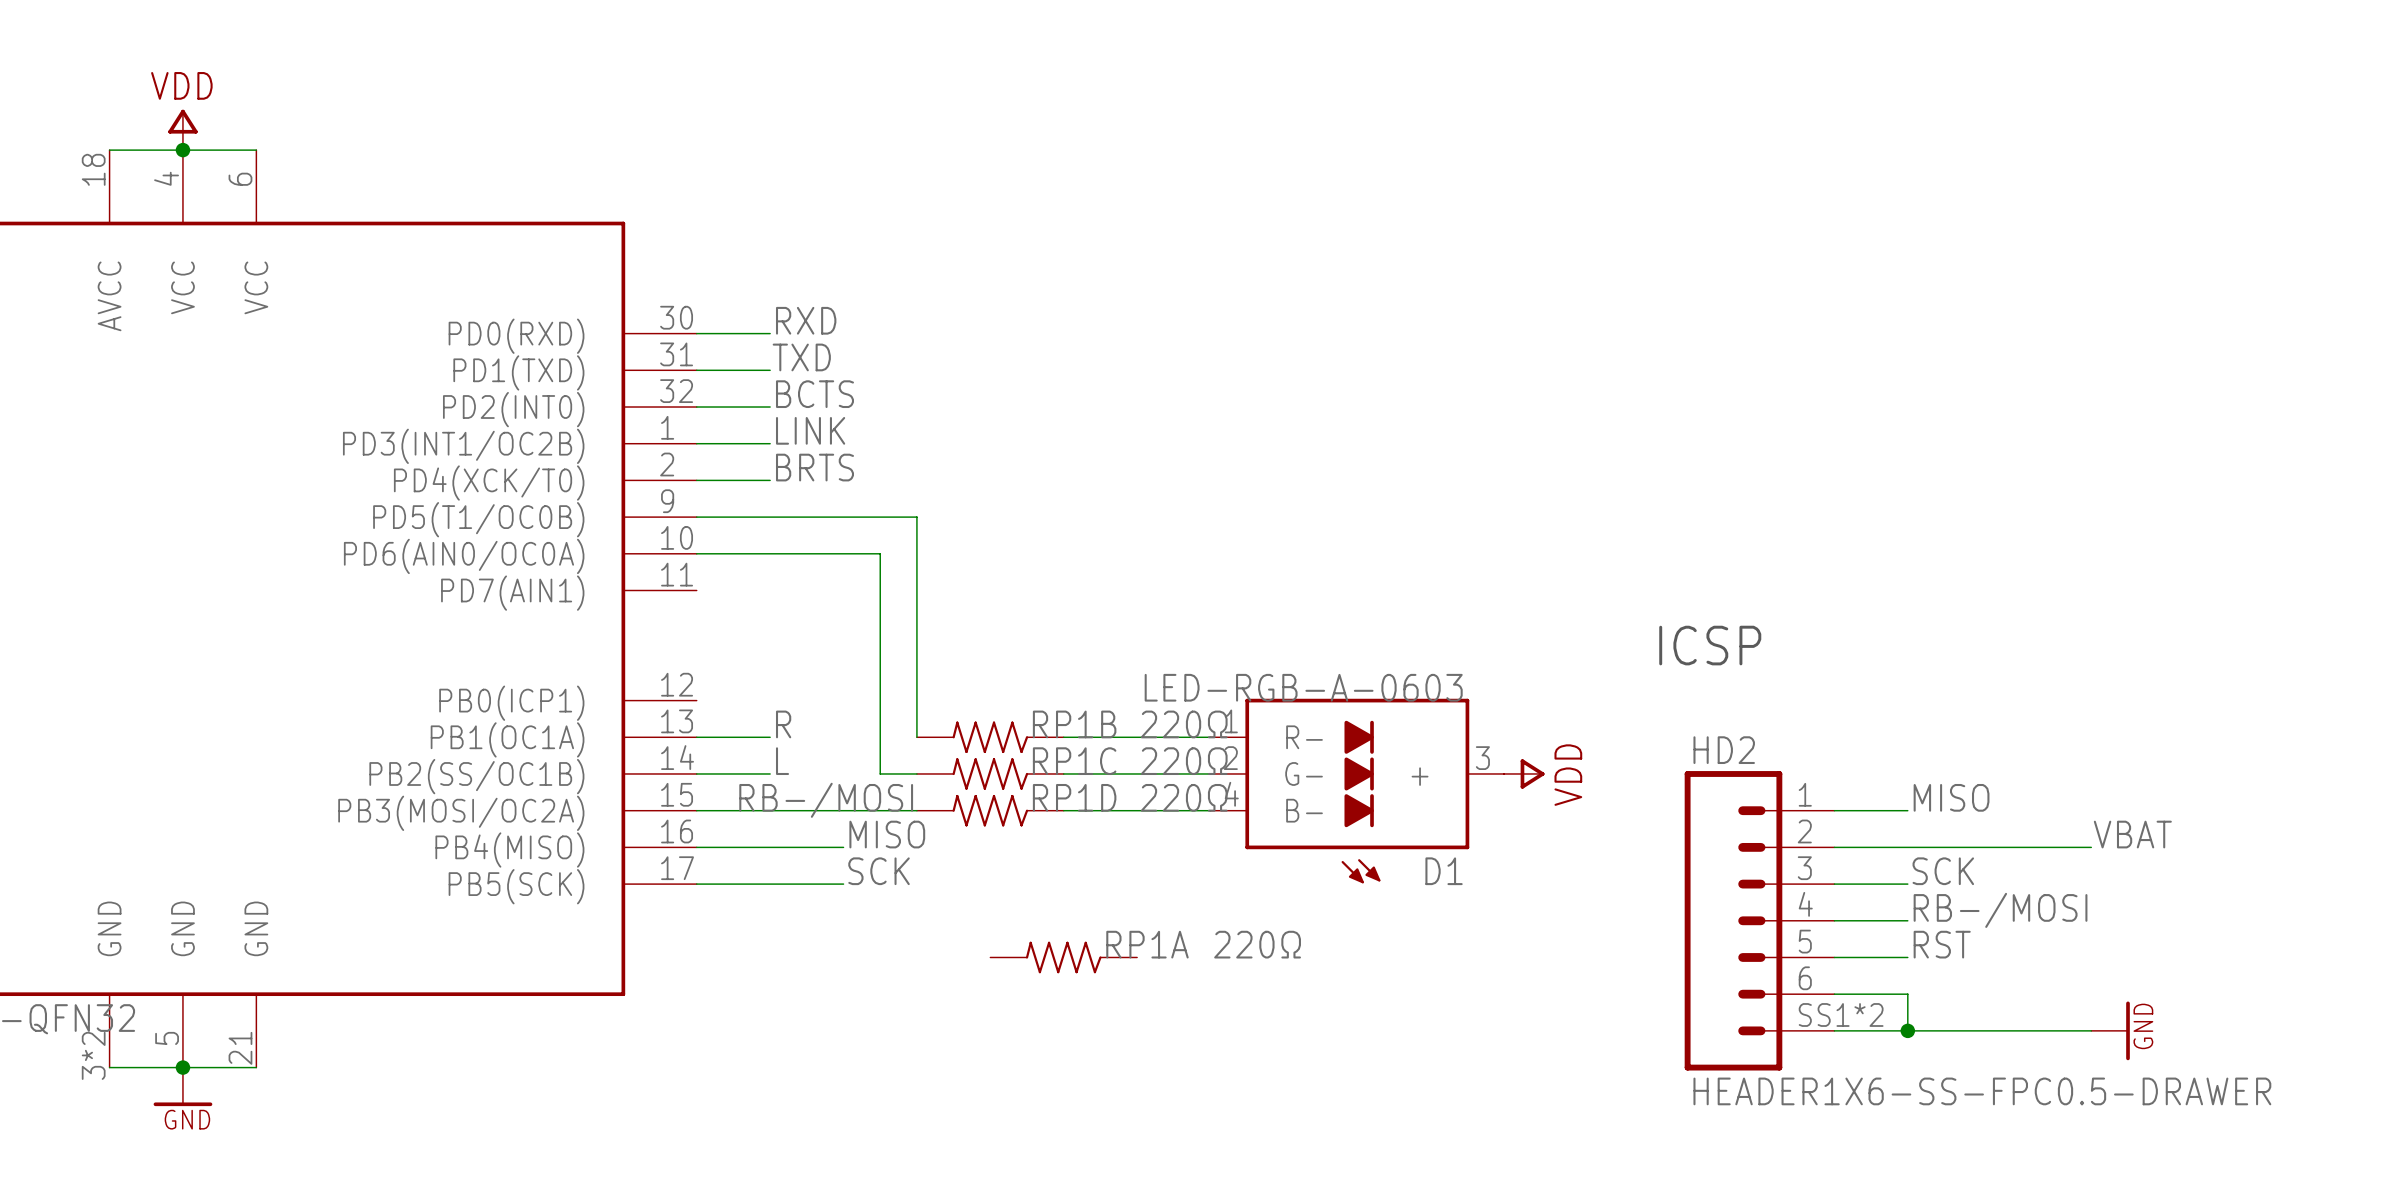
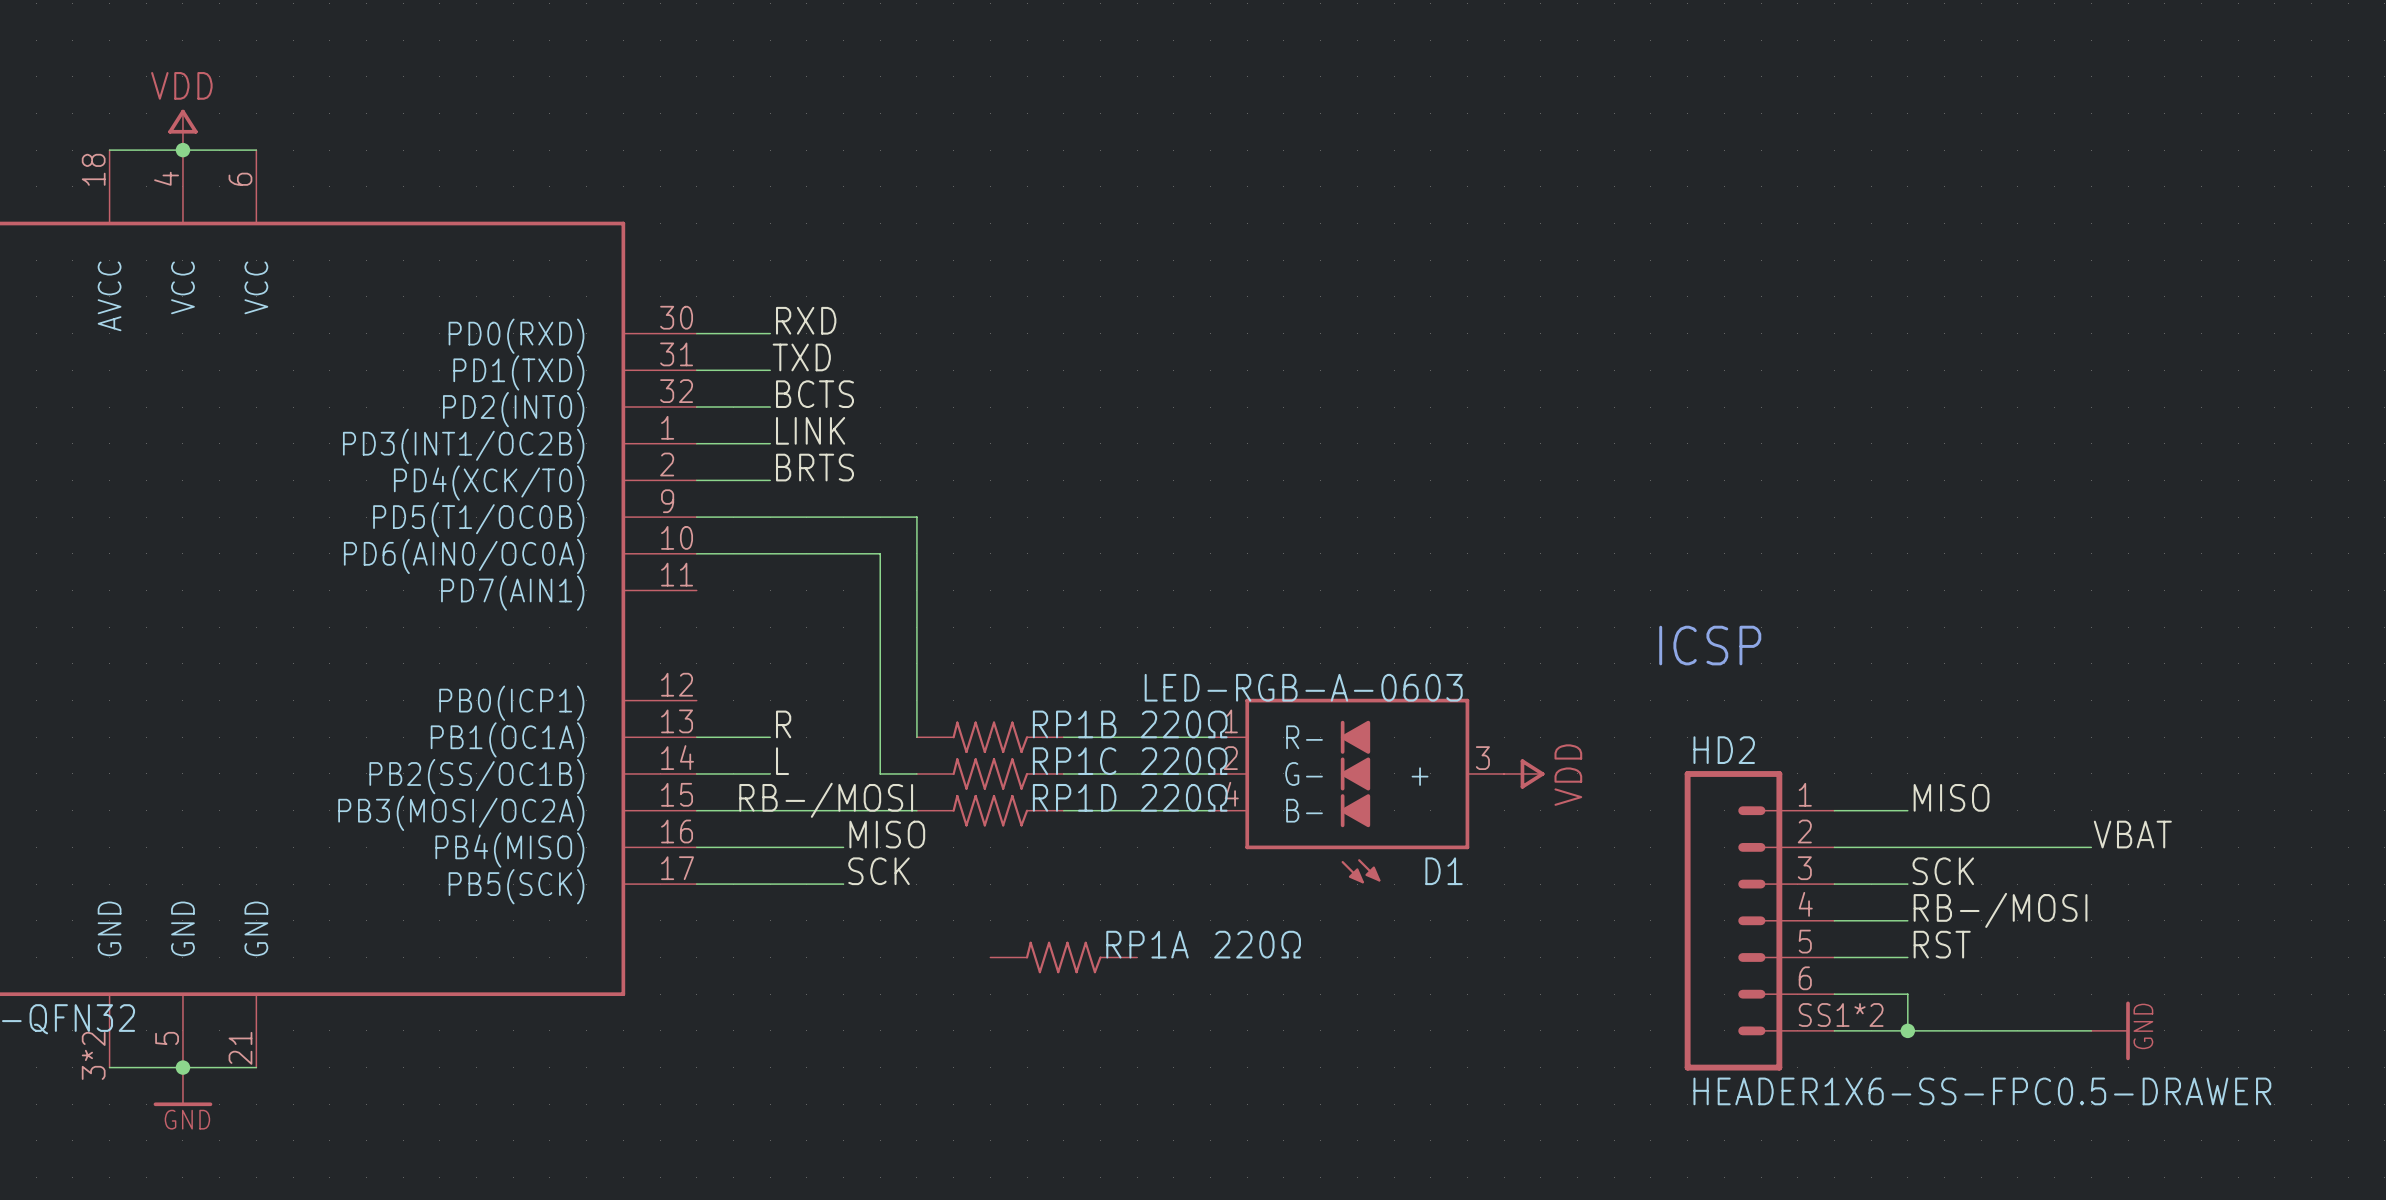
D1 symbol: [1210, 698, 1505, 884] -> [1210, 698, 1505, 884]

